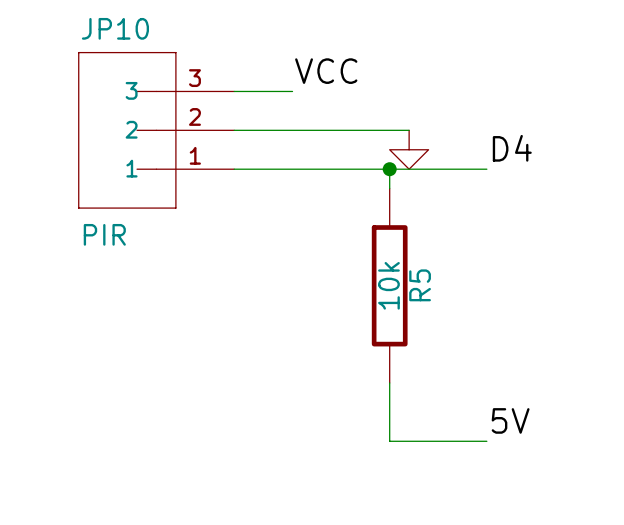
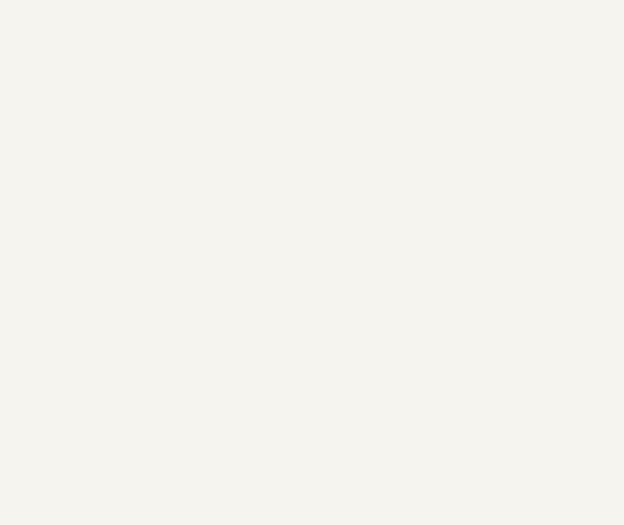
label: VCC (326, 71) -> none
wire: (234, 91) (292, 91) -> none
JP10: PIR (156, 130) -> none
wire: (234, 130) (409, 130) -> none
label: D4 (512, 148) -> none
power symbol: (409, 149) -> none
wire: (234, 169) (486, 169) -> none
wire: (389, 169) (389, 188) -> none
junction: (389, 169) -> none
R5: 10k (389, 285) -> none
wire: (389, 382) (389, 441) (486, 441) -> none
label: 5V (510, 420) -> none

